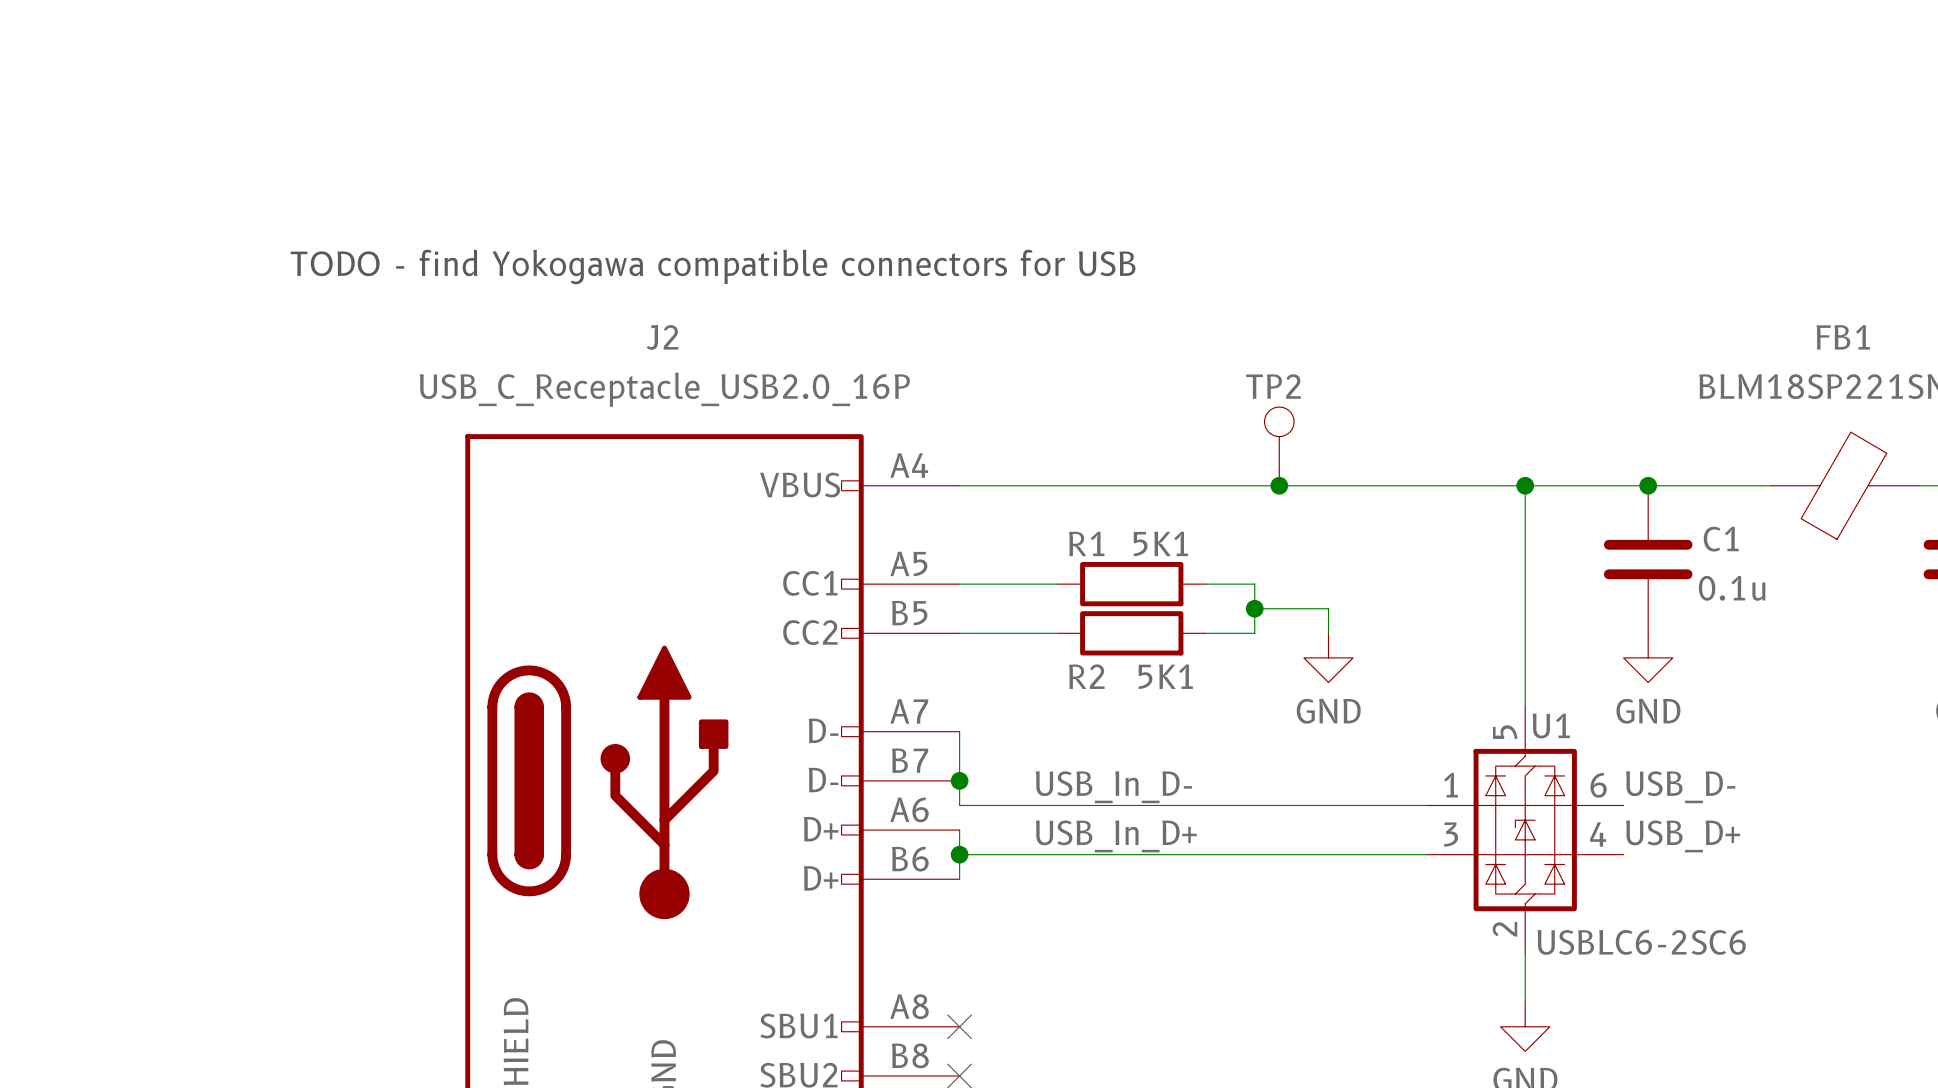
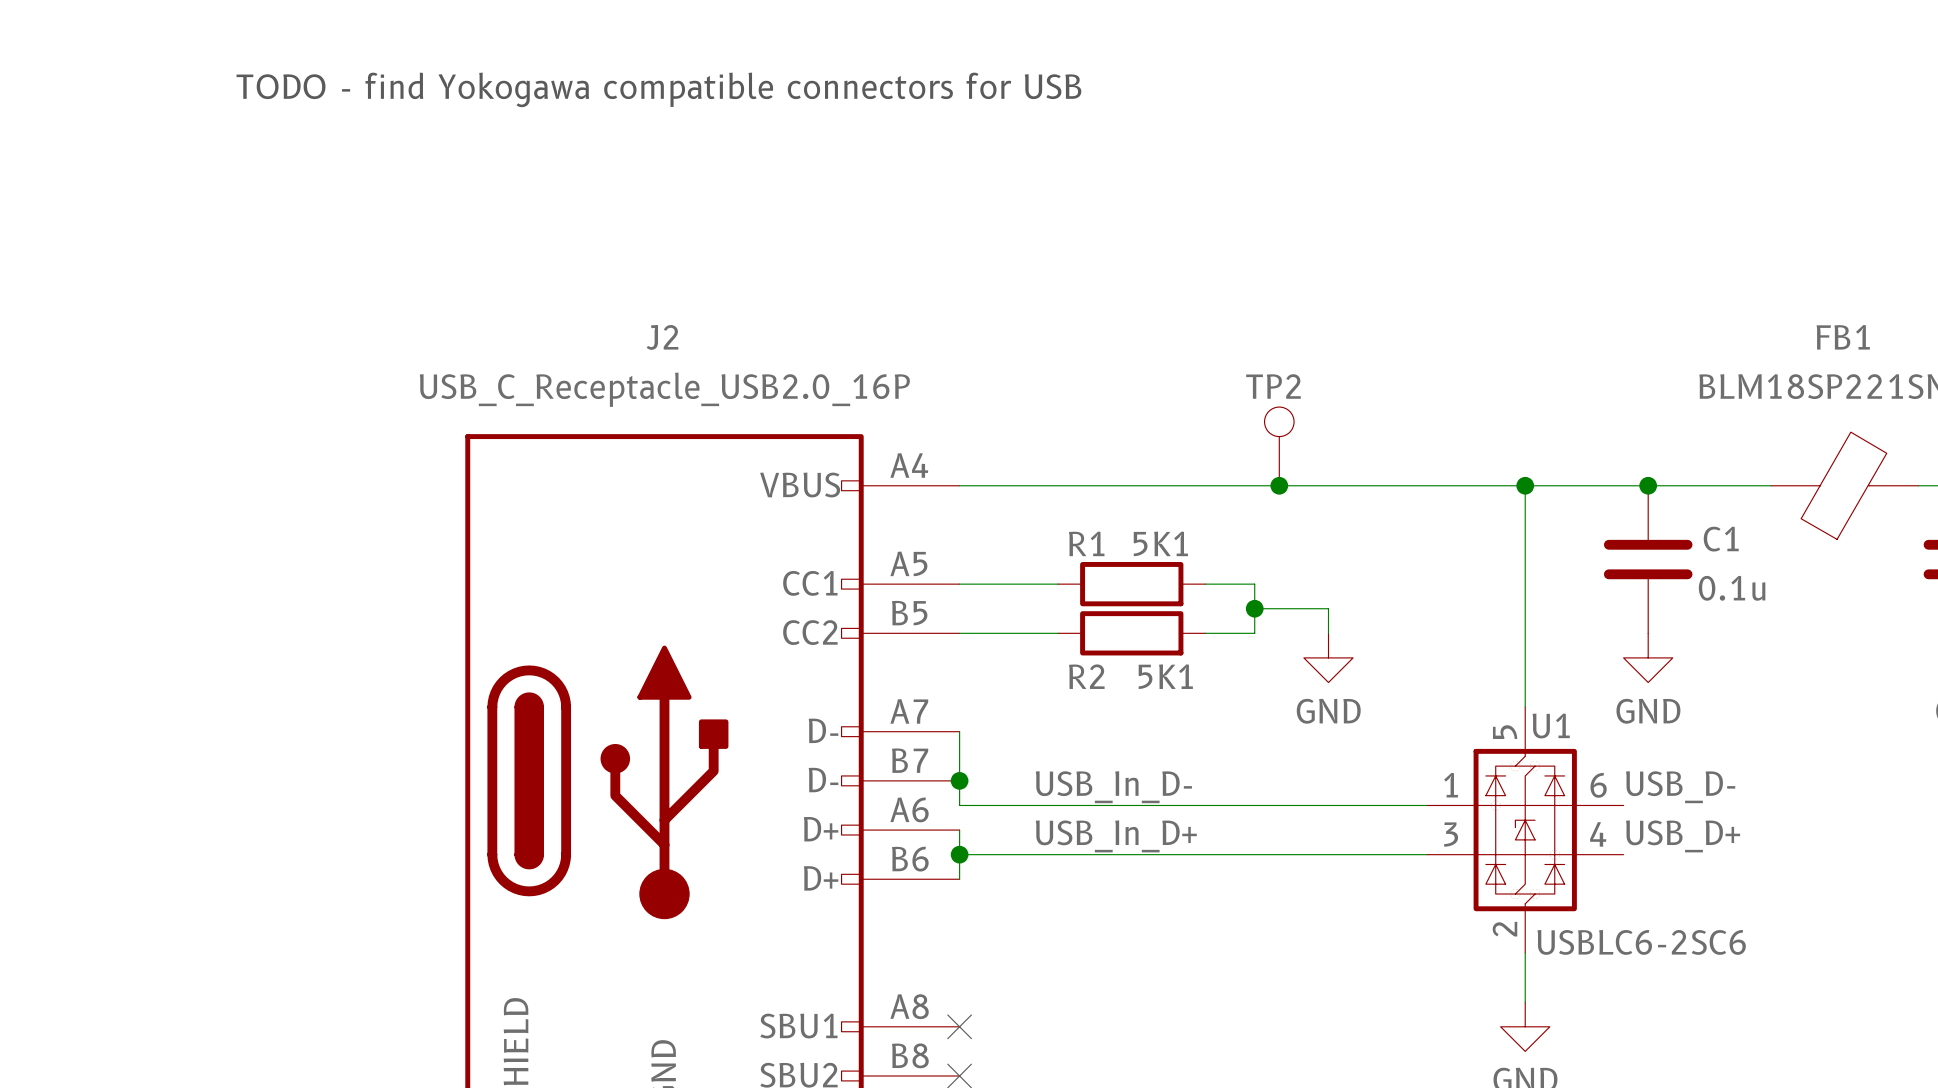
text position: TODO - find Yokogawa compatible connectors for USB (713, 266) -> TODO - find Yokogawa compatible connectors for USB (658, 89)

